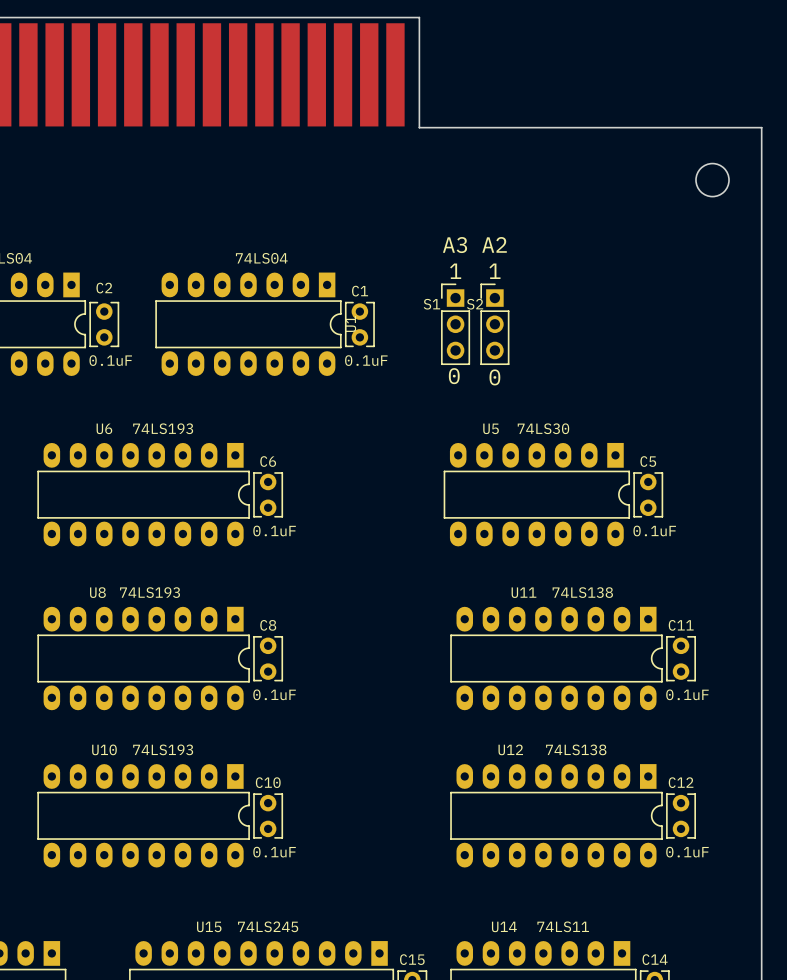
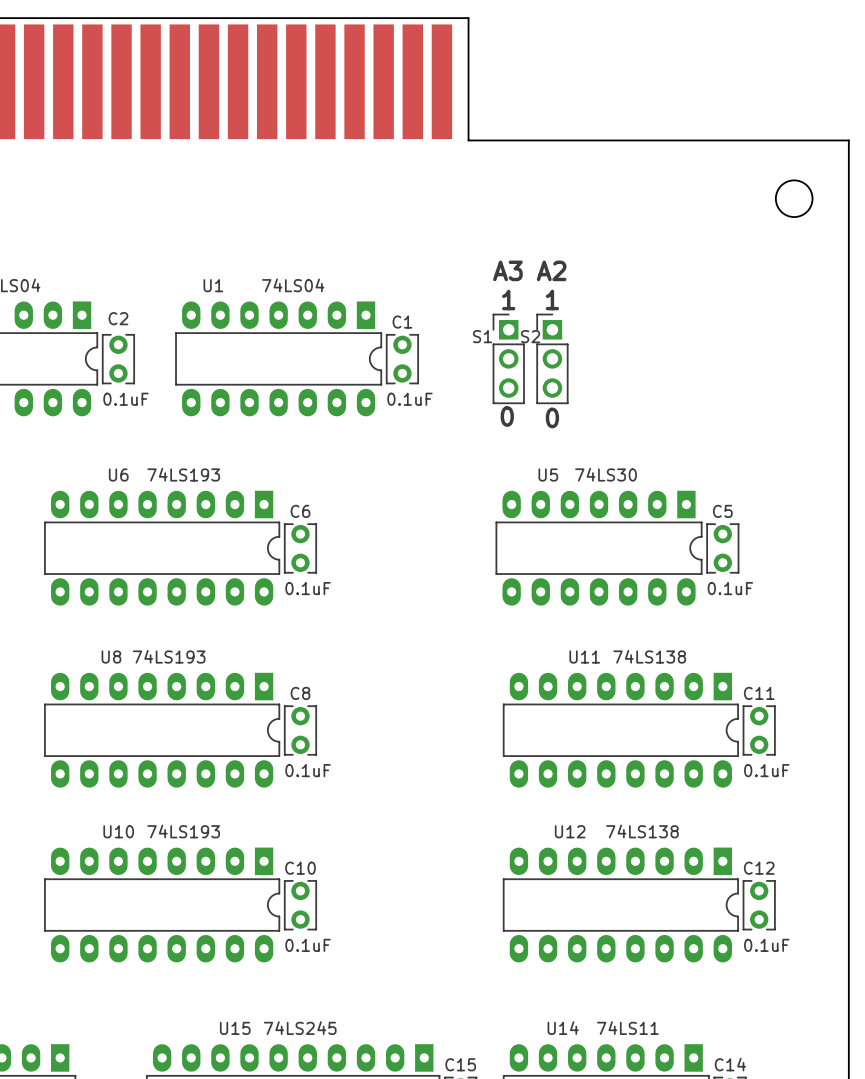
U1 name rotation: 0° (350, 324) -> 90° clockwise (213, 285)
U1 name position: U1 (350, 324) -> U1 (213, 285)

